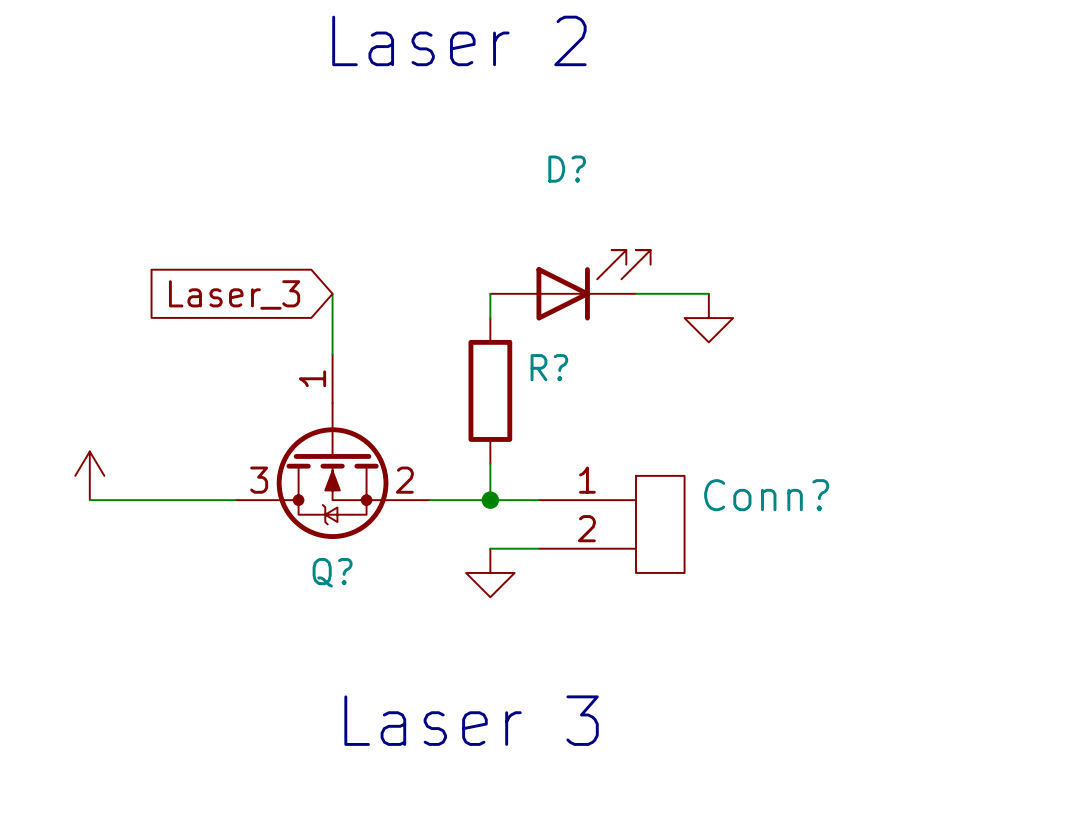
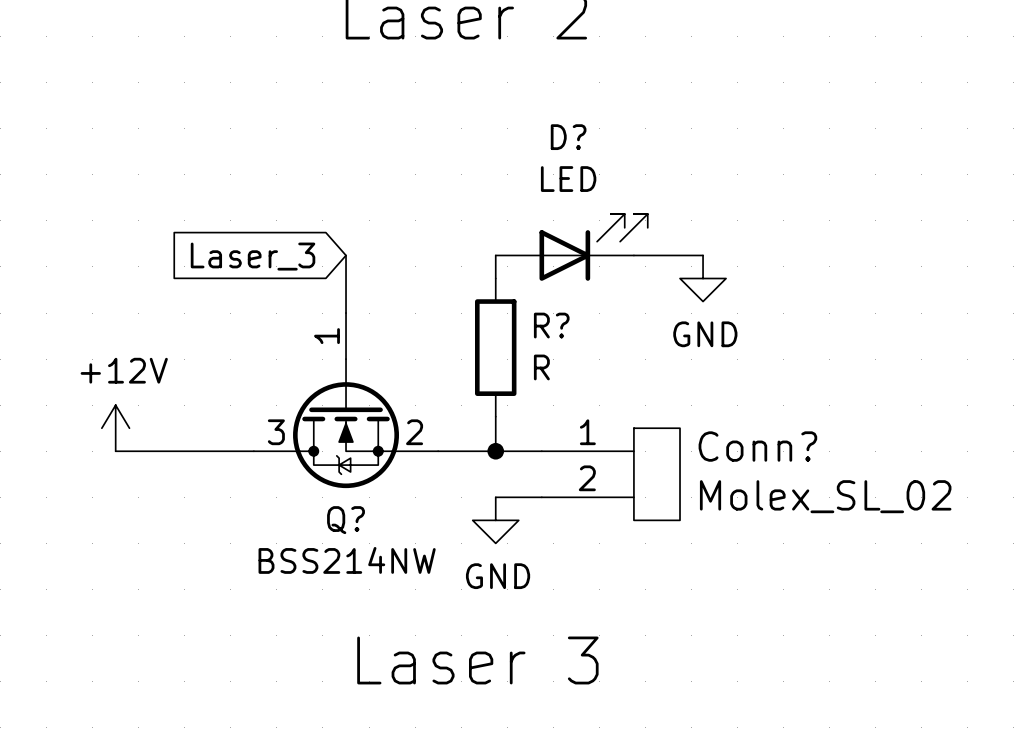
D? value: none -> LED (568, 179)
power symbol text: none -> GND (705, 334)
R? value: none -> R (541, 367)
power symbol text: none -> +12V (124, 370)
Conn? value: none -> Molex_SL_02 (825, 496)
Q? value: none -> BSS214NW (347, 560)
power symbol text: none -> GND (498, 576)

